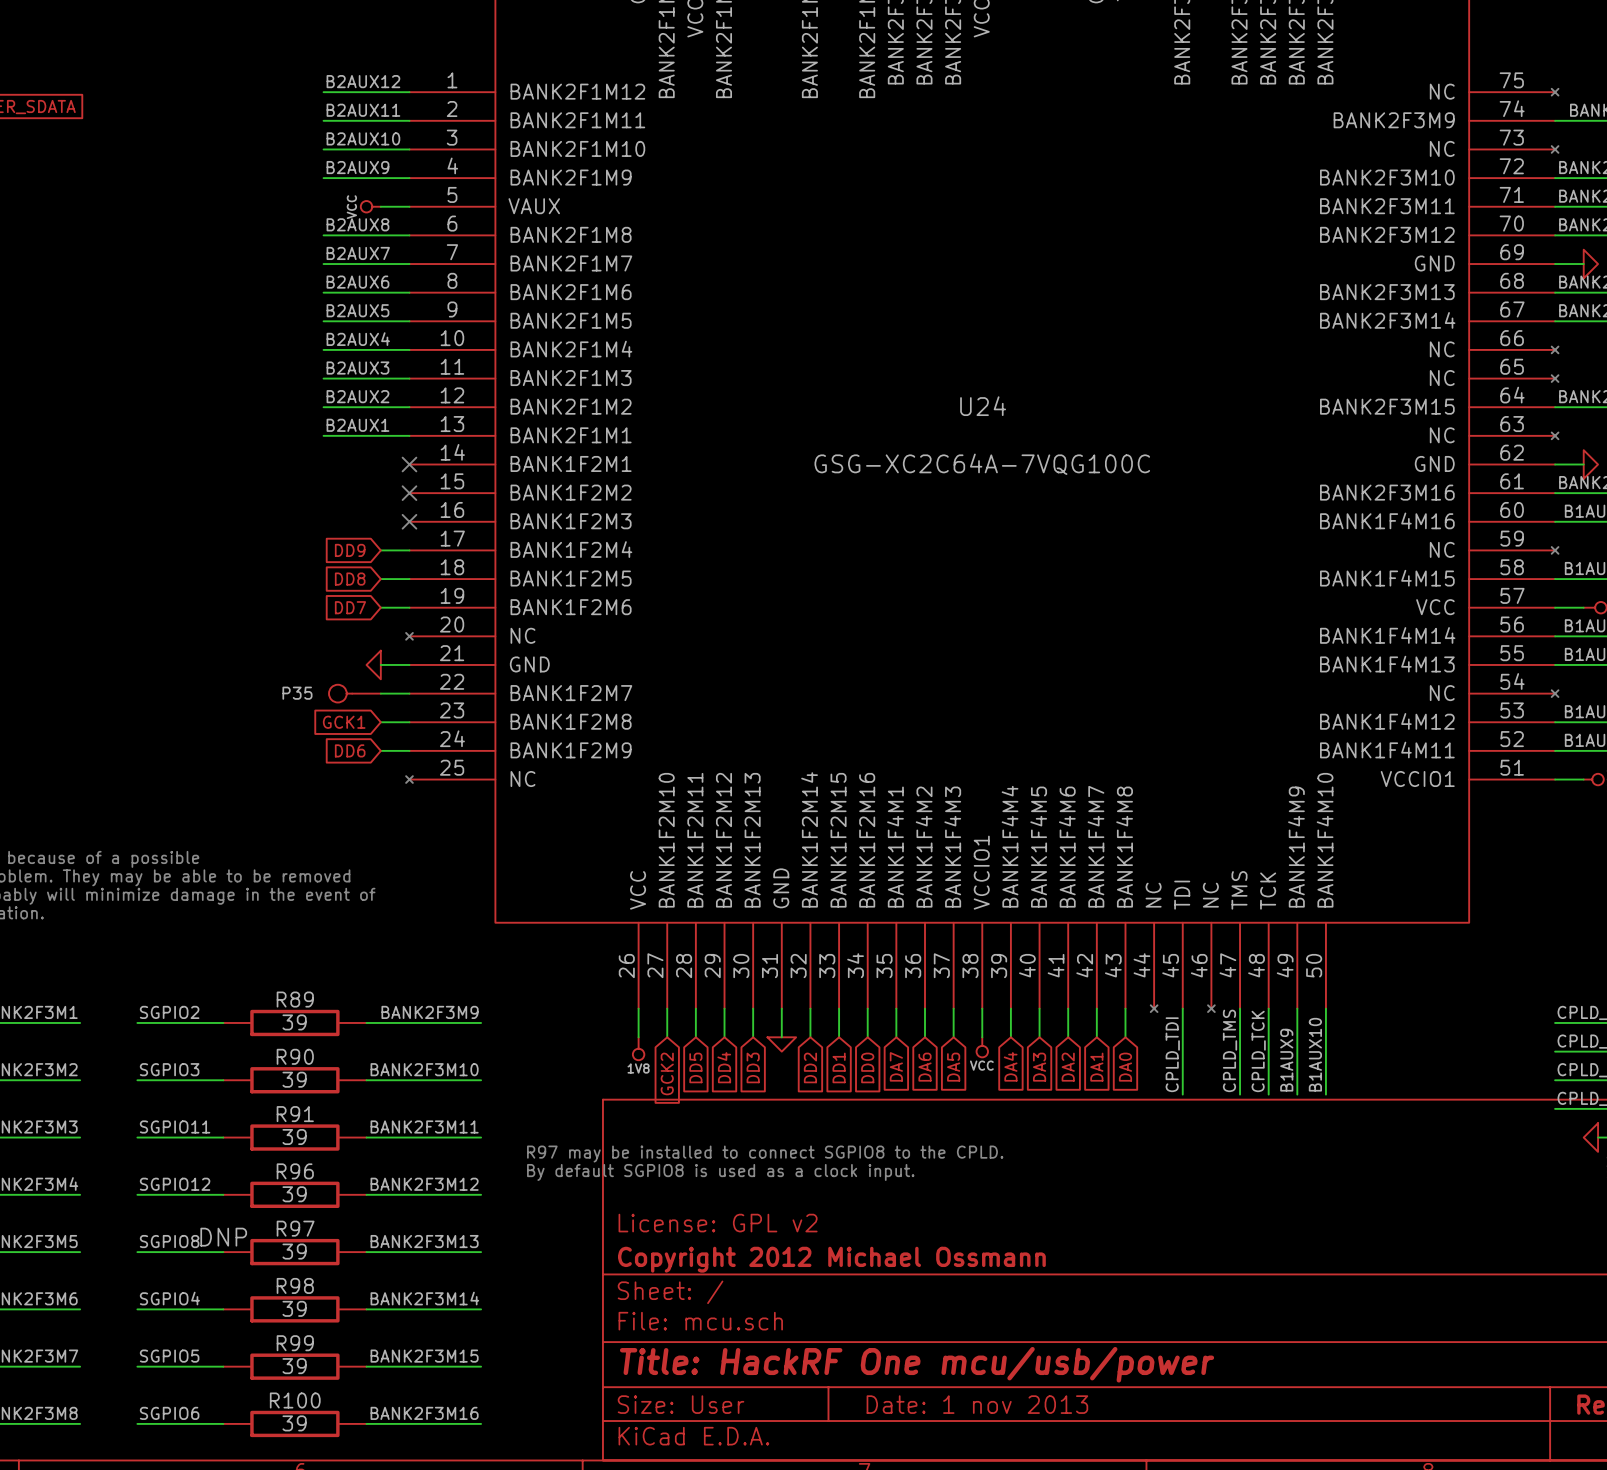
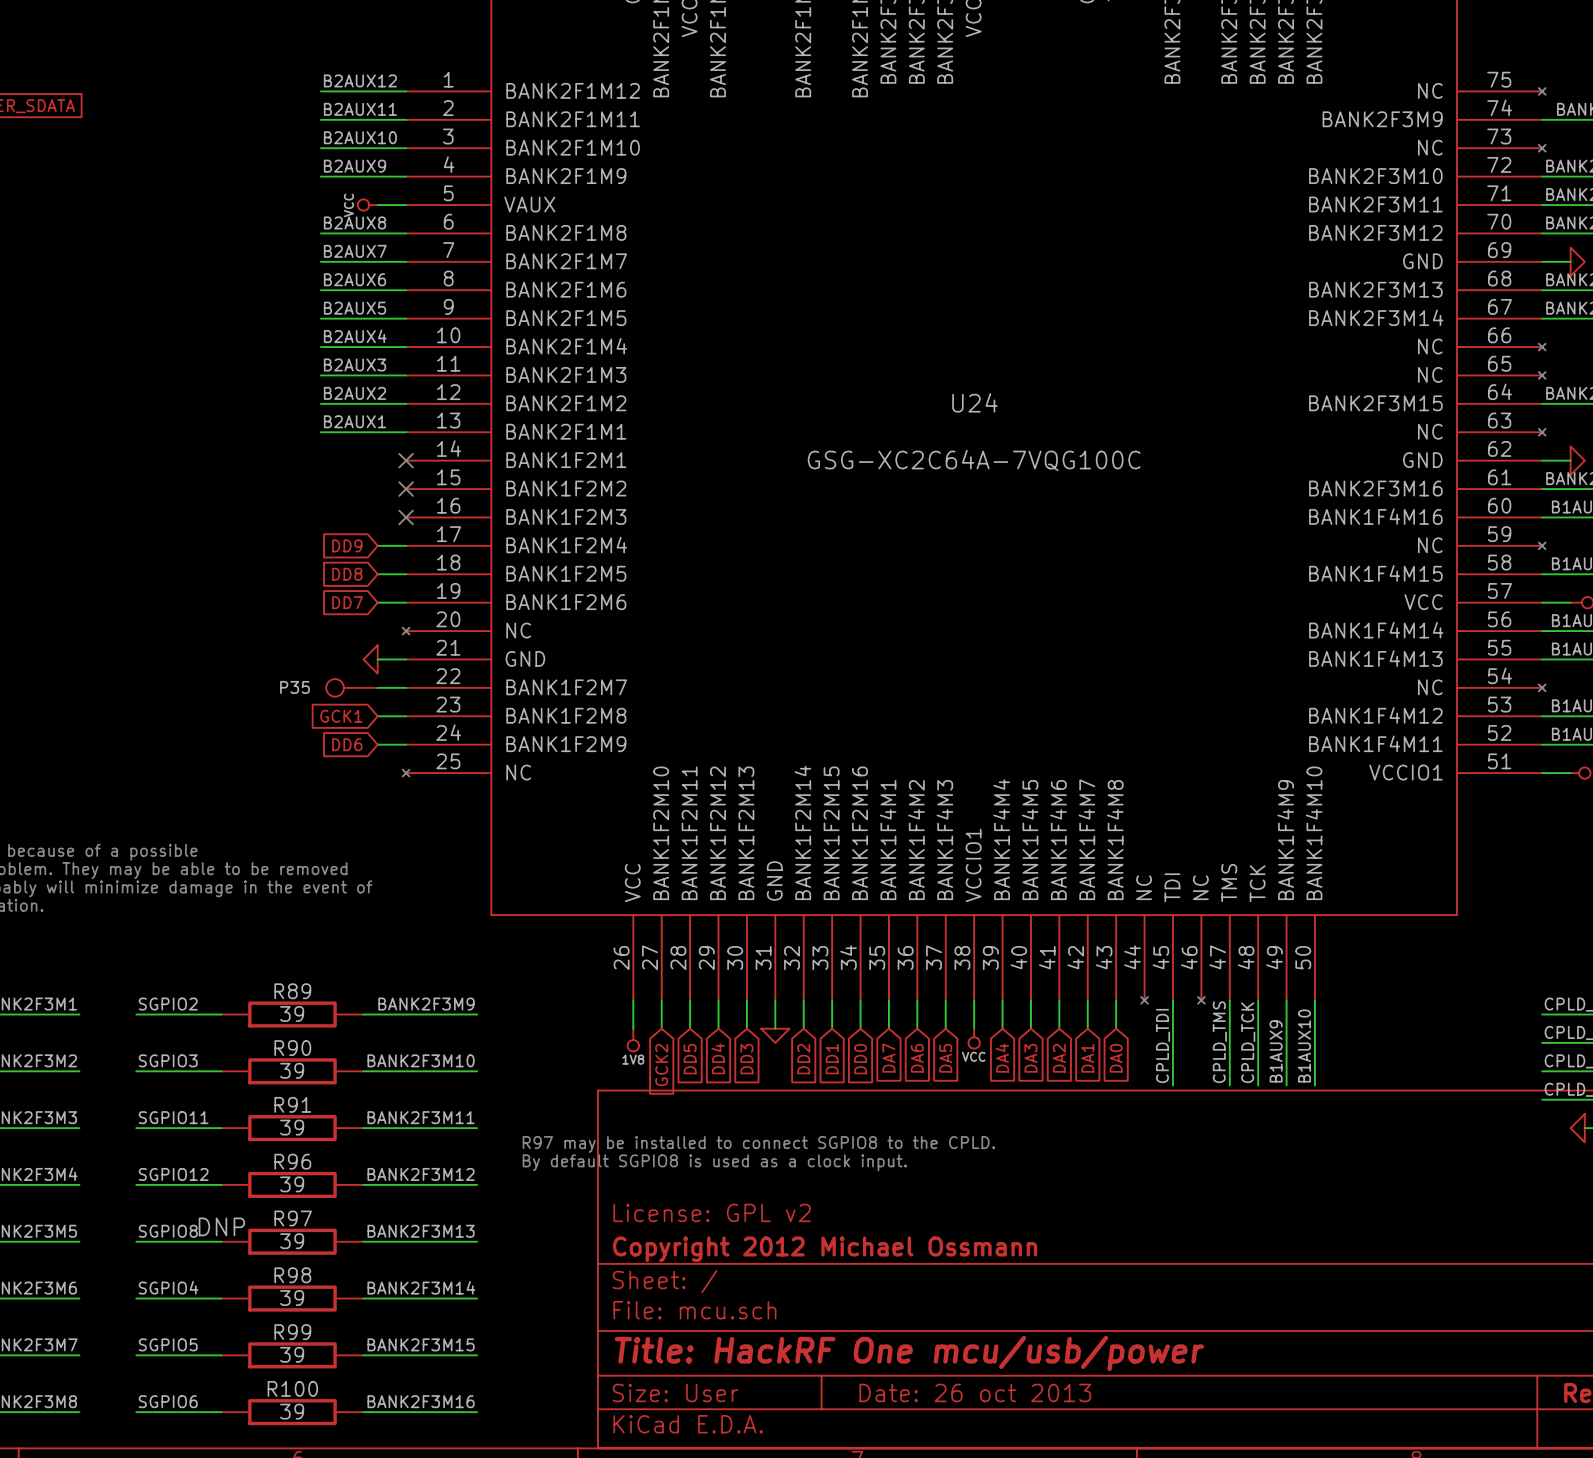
title block: Date: 1 nov 2013 (977, 1404) -> Date: 26 oct 2013 (975, 1392)

